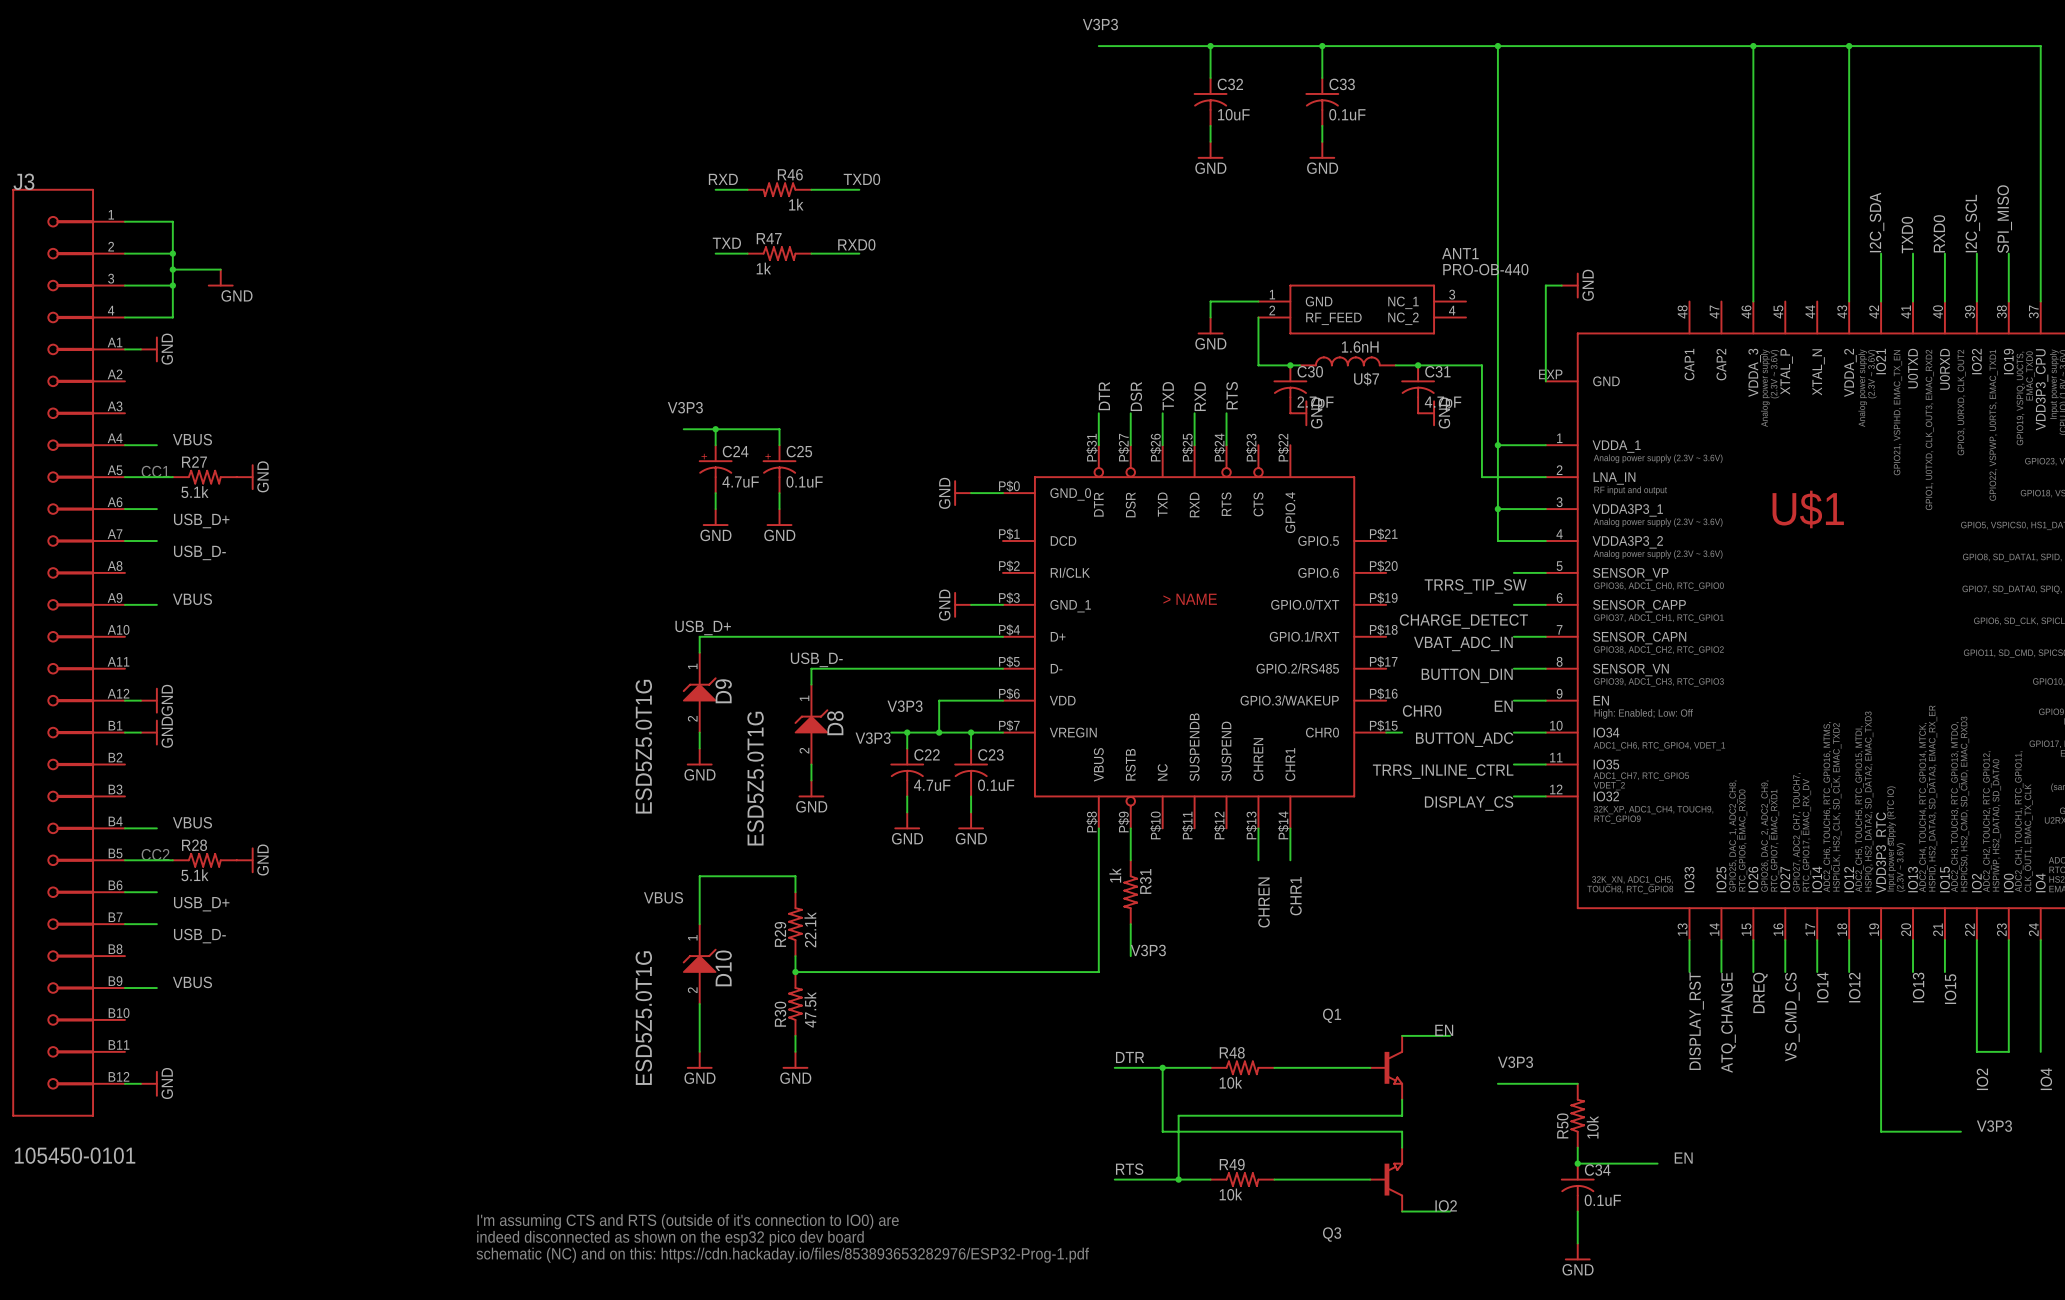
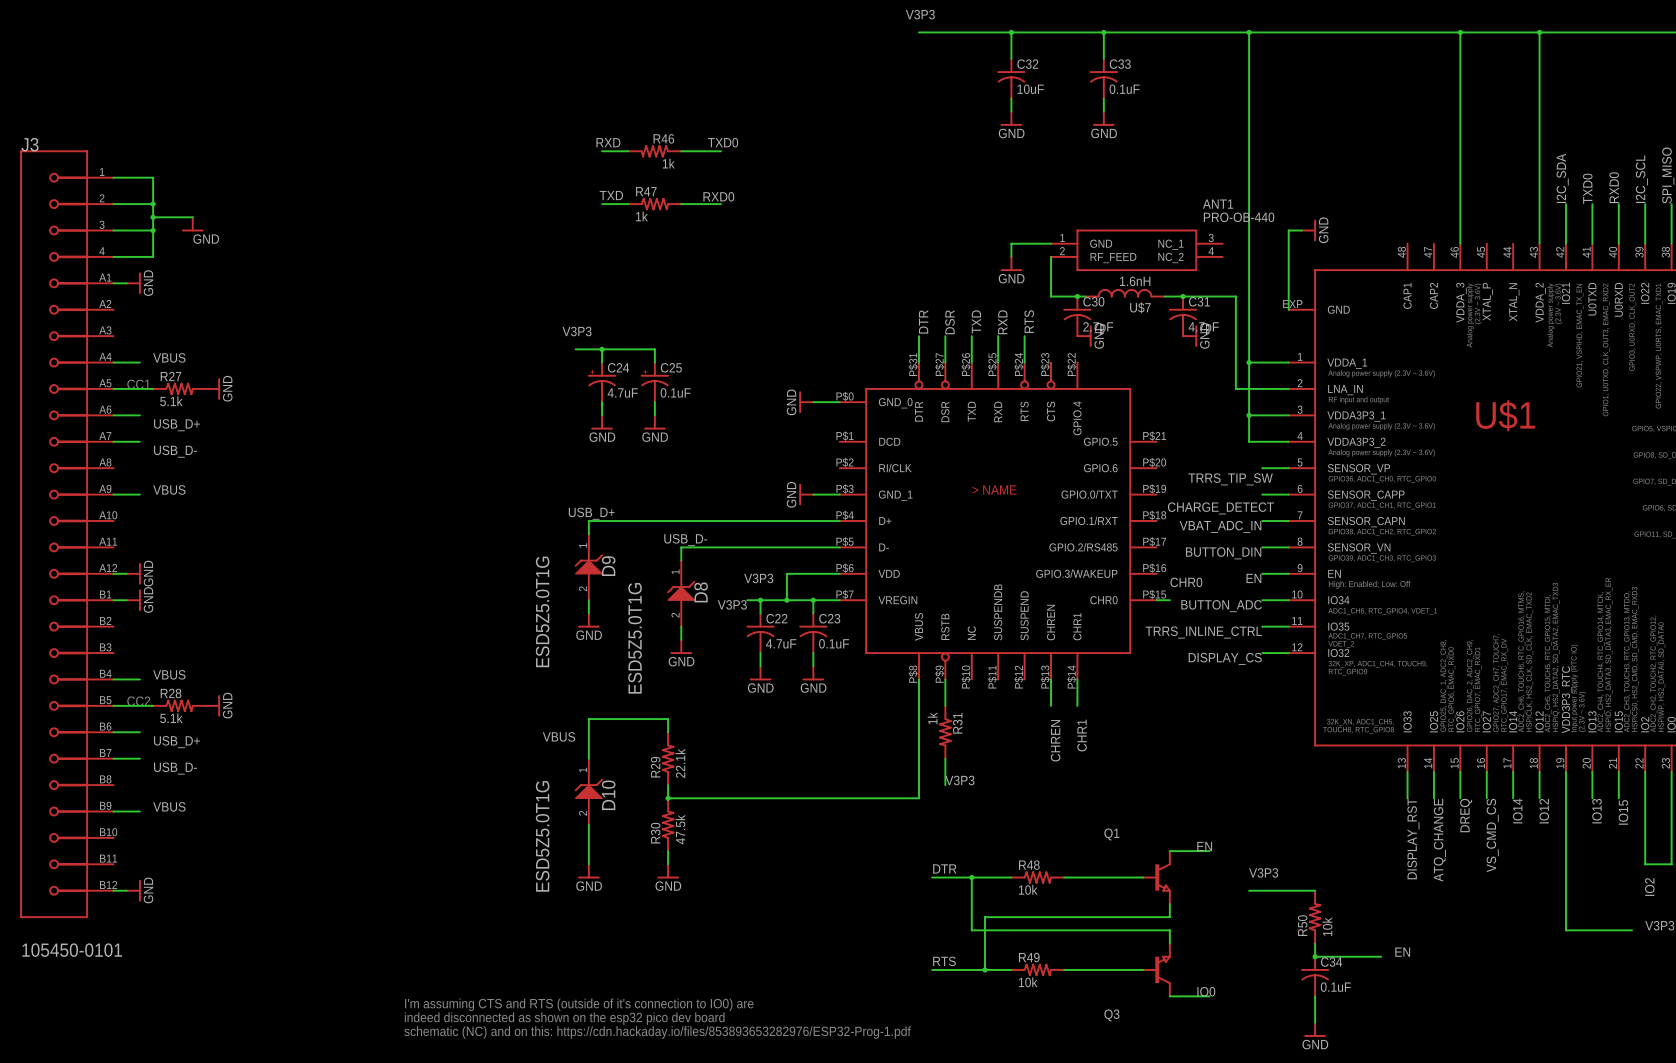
label: IO2 (1446, 1205) -> IO0 (1206, 991)

